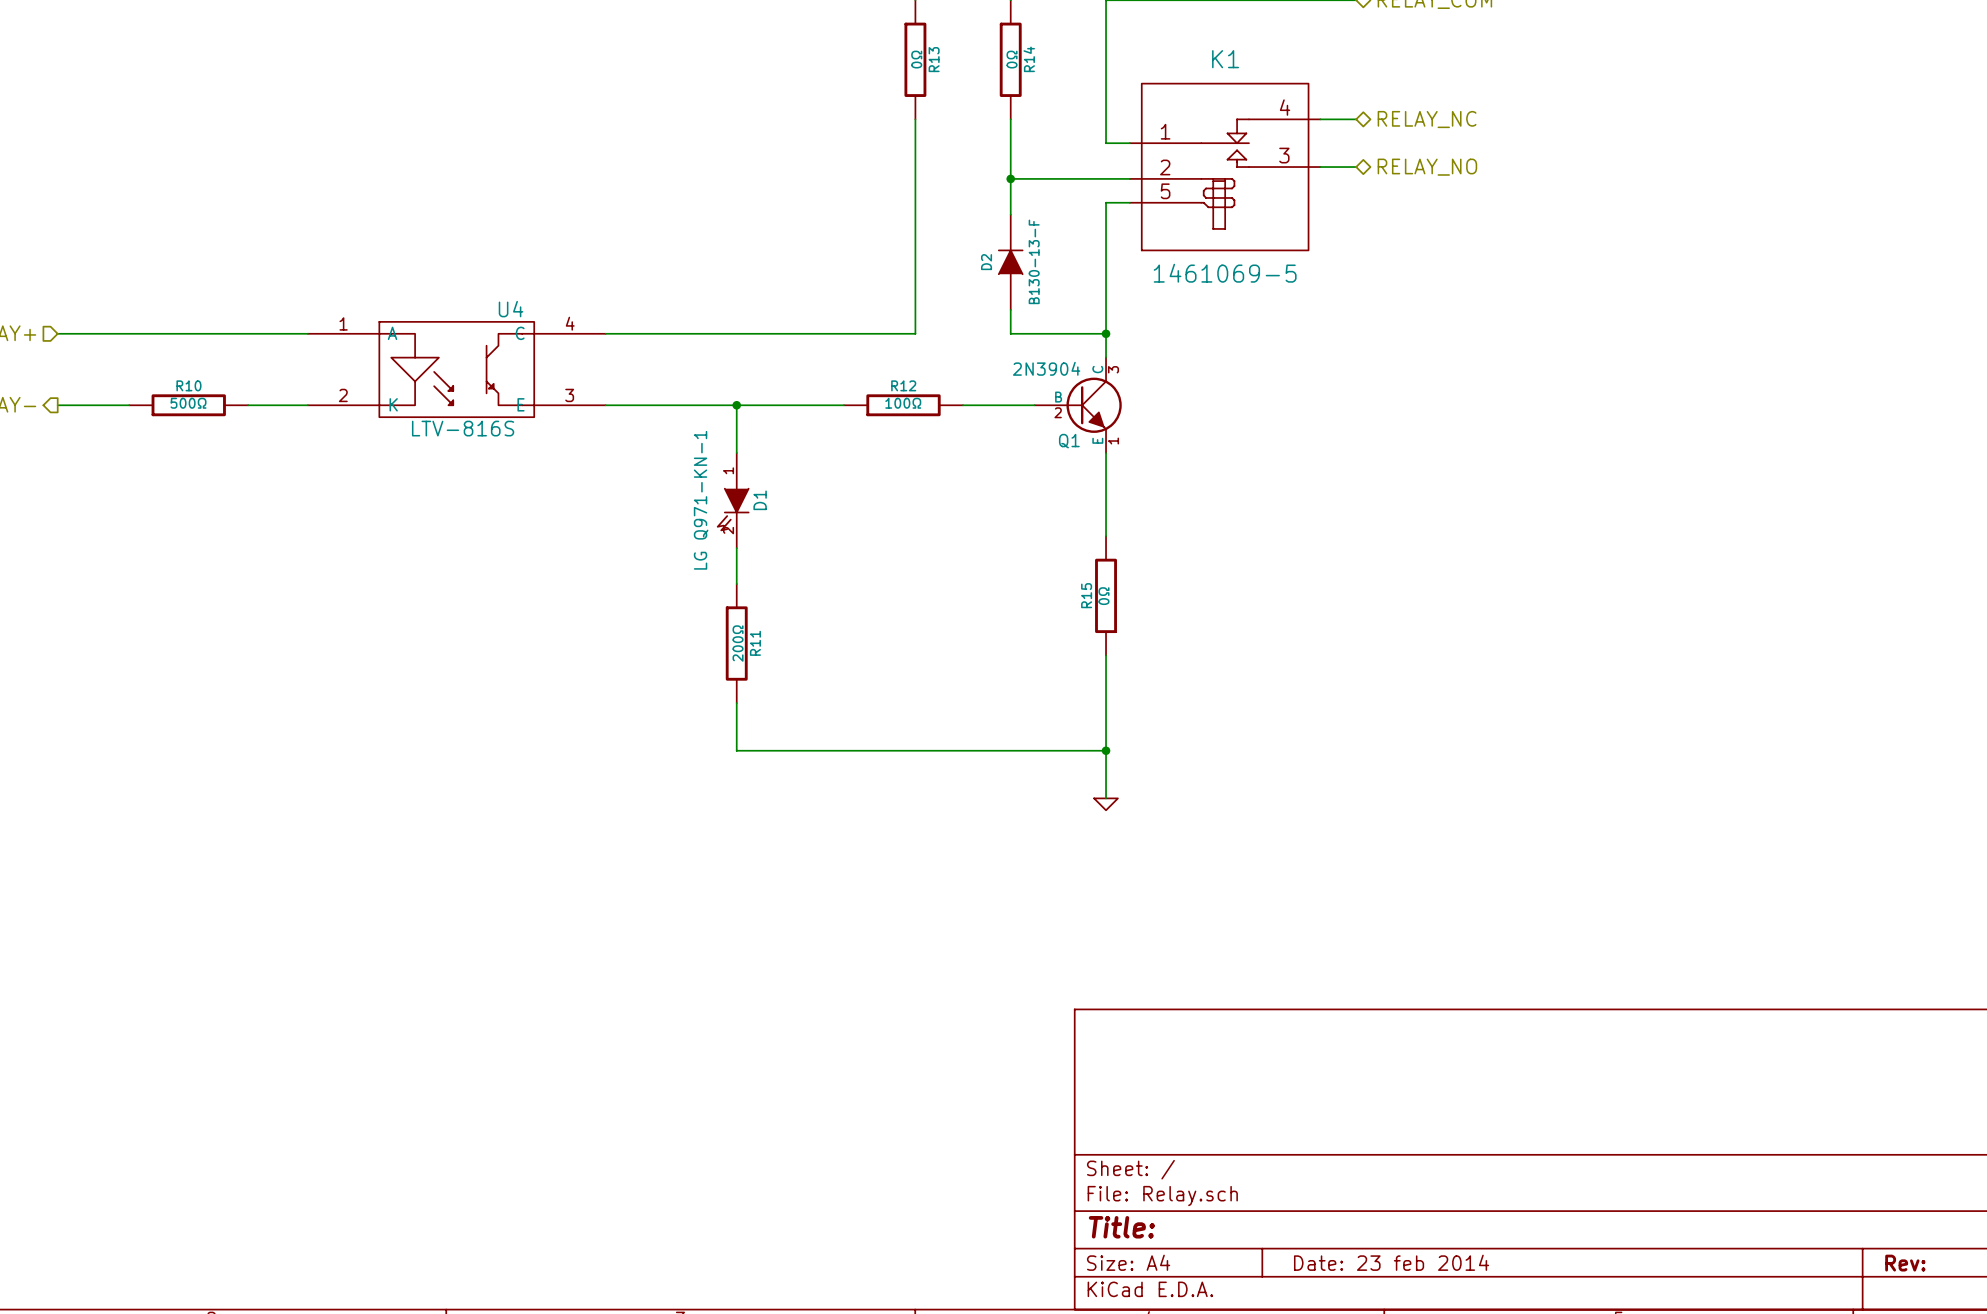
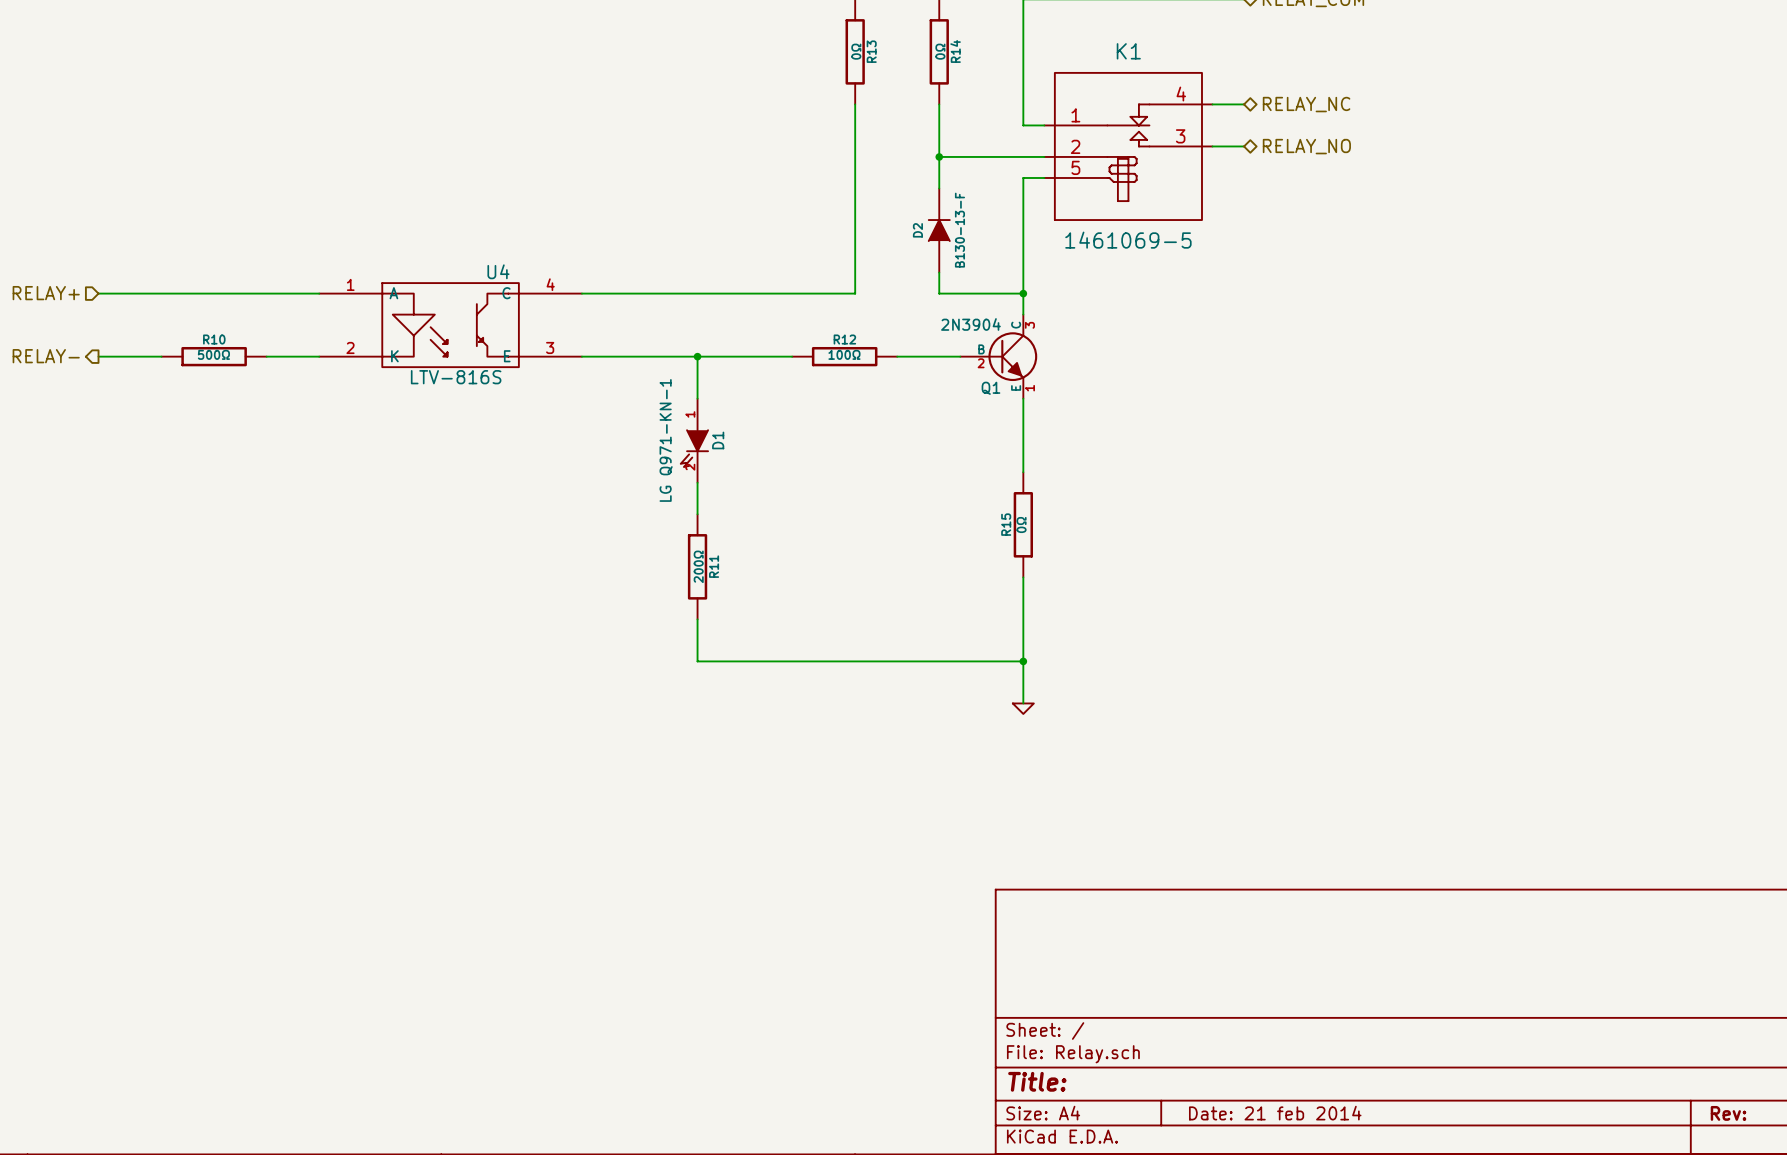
title block: Date: 23 feb 2014 (1391, 1262) -> Date: 21 feb 2014 (1275, 1113)

